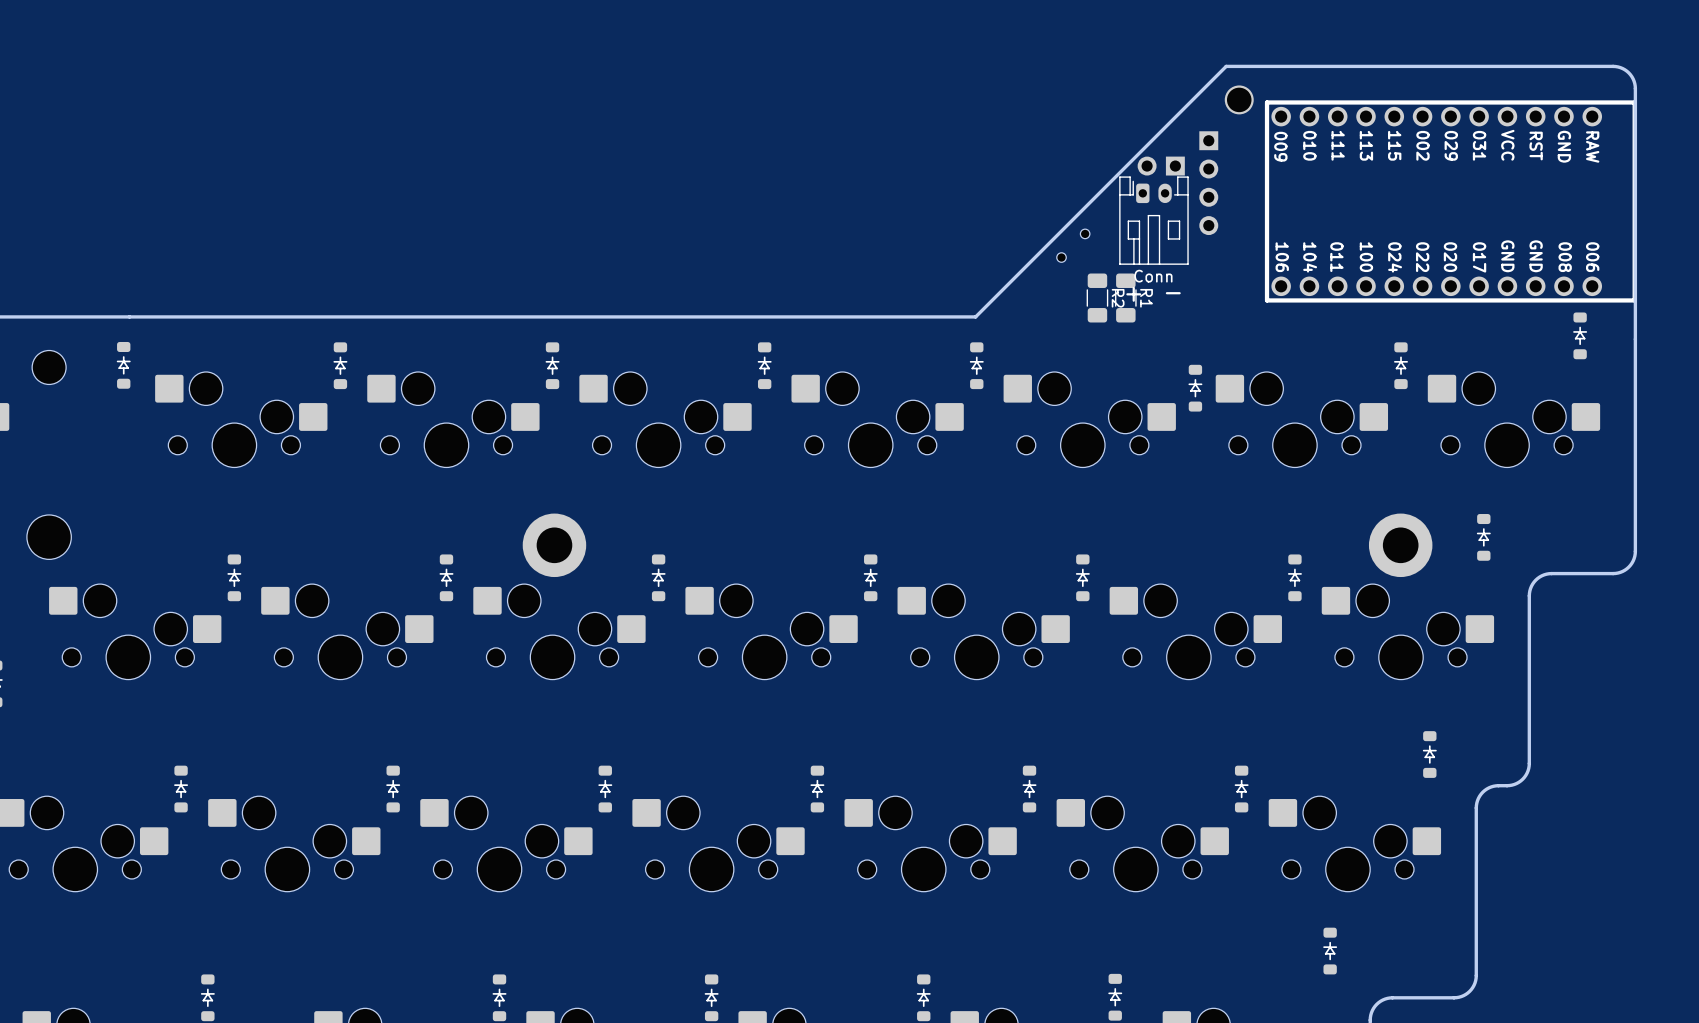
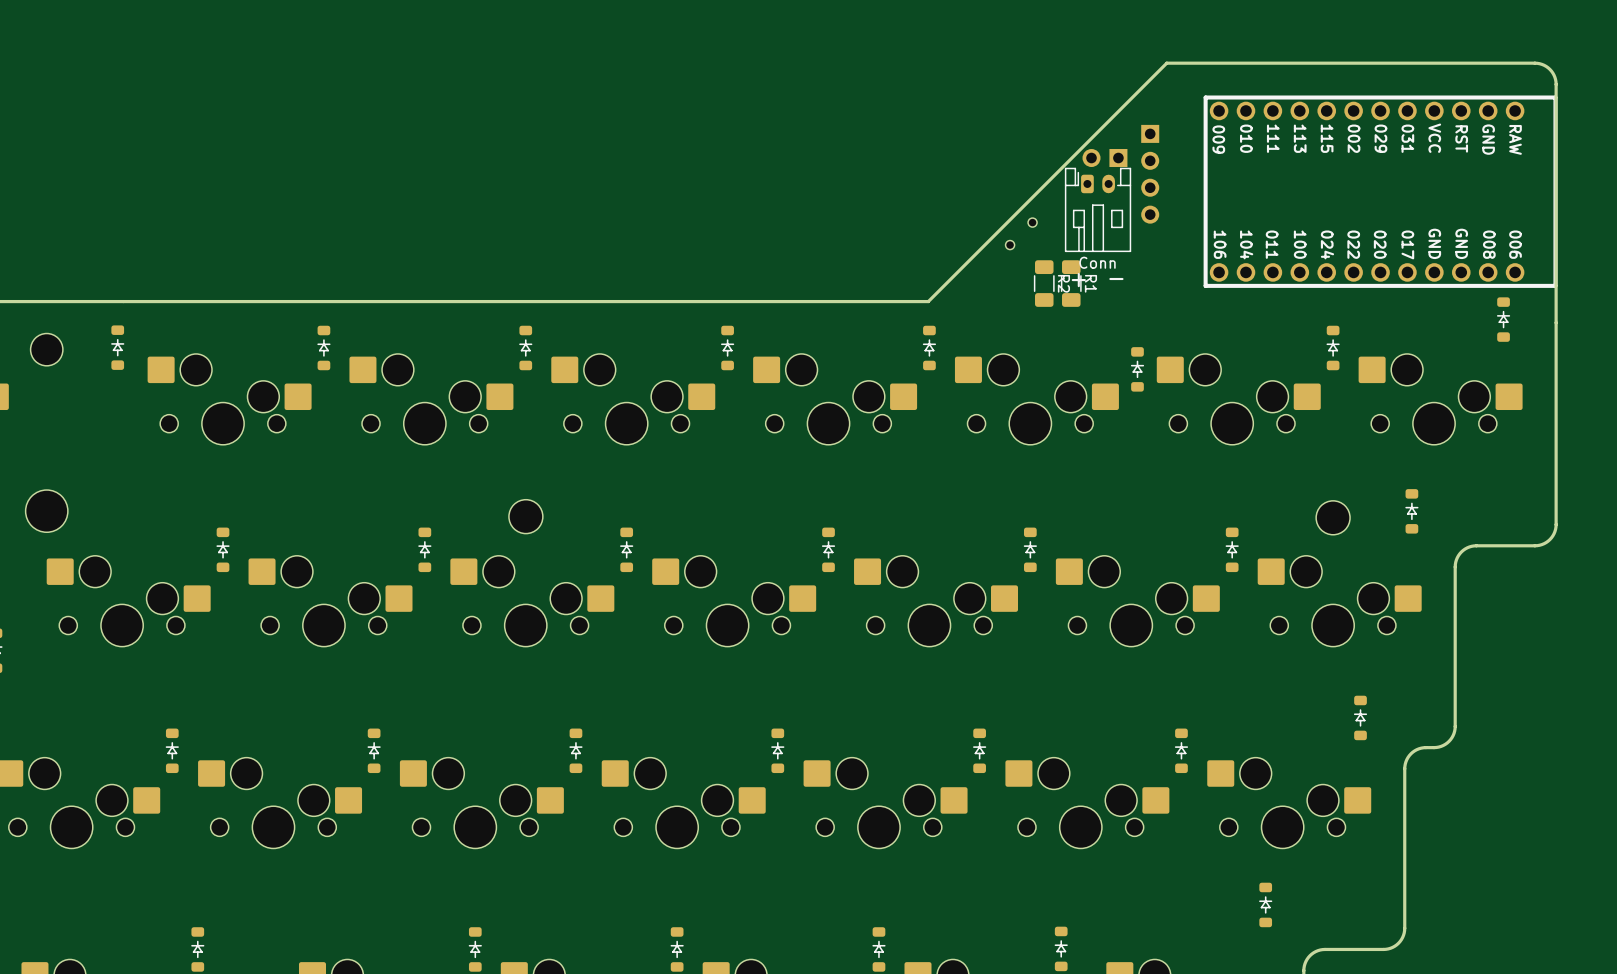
part: (1239, 99) -> none
part footprint: [522, 513, 587, 578] -> [508, 499, 543, 534]
part footprint: [1368, 513, 1433, 578] -> [1316, 500, 1351, 535]

